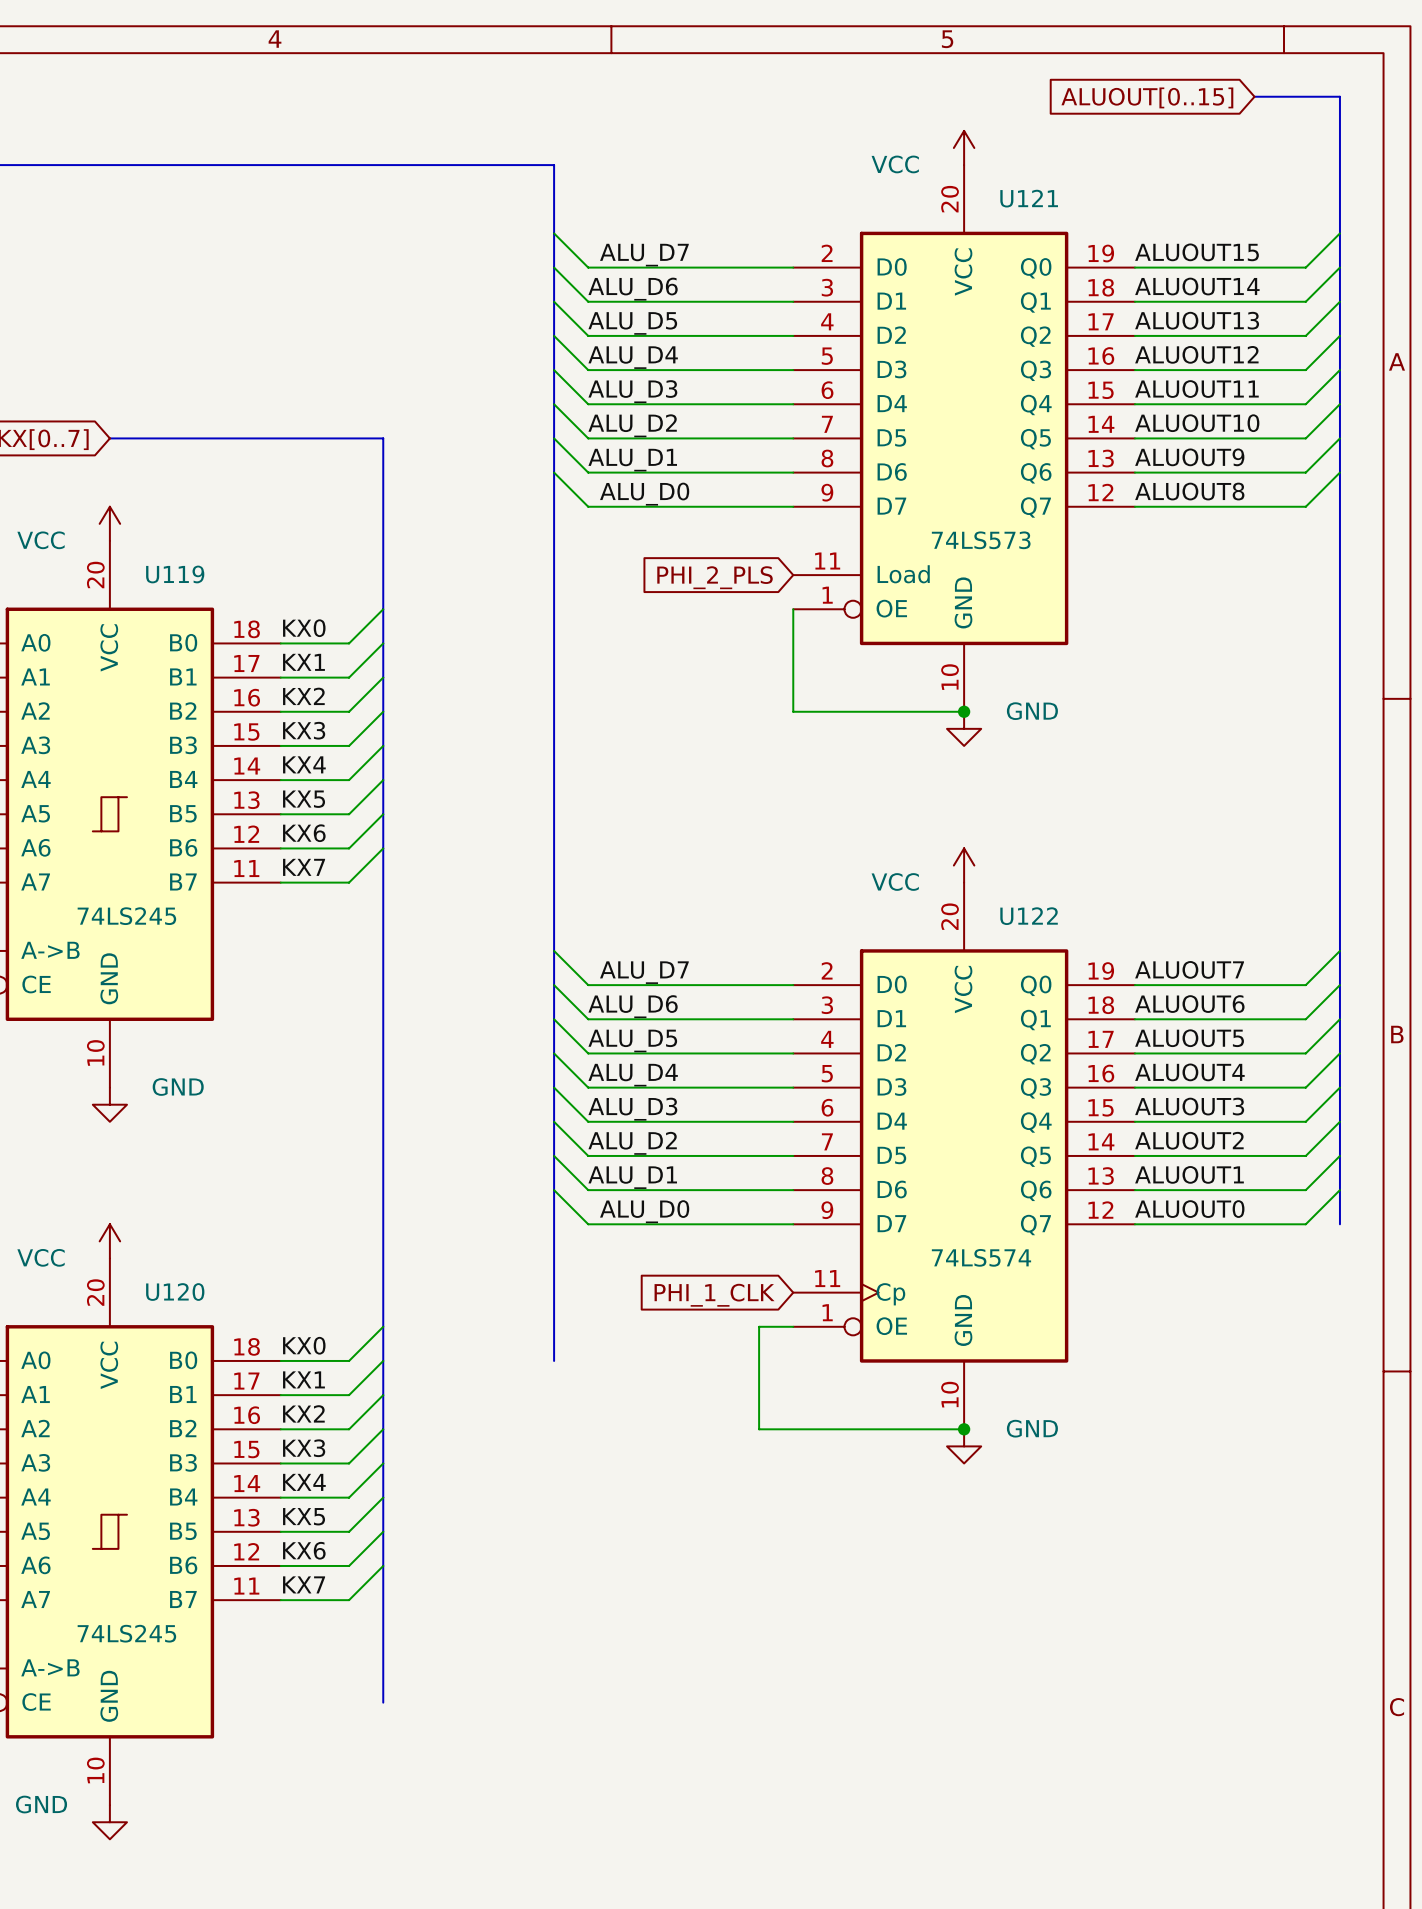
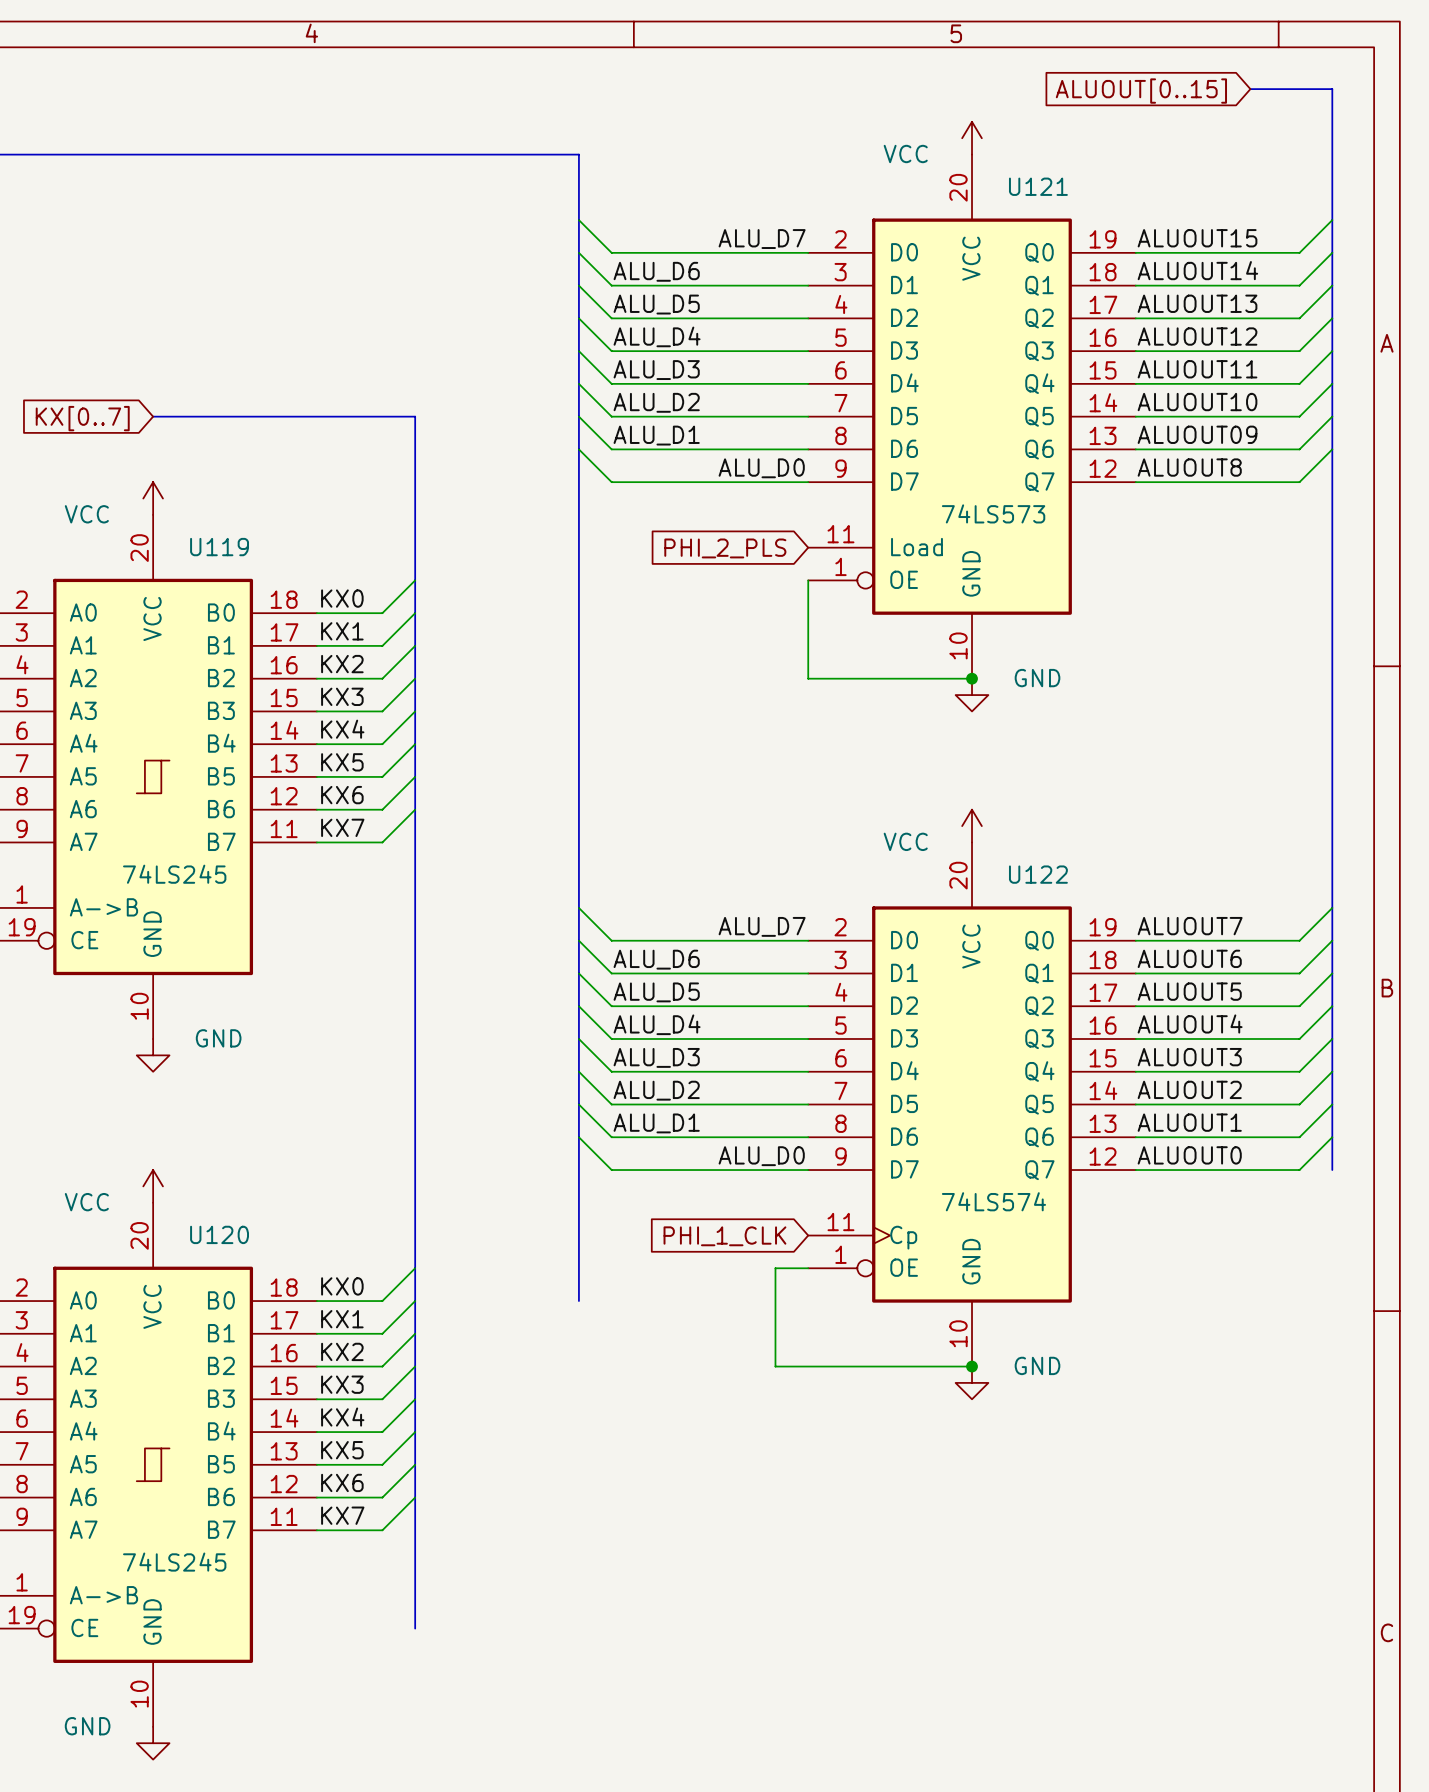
label position: ALU_D7 (644, 255) -> ALU_D7 (762, 239)
label: ALUOUT9 (1189, 457) -> ALUOUT09 (1197, 434)
label position: ALU_D0 (644, 494) -> ALU_D0 (761, 468)
label position: ALU_D7 (644, 972) -> ALU_D7 (762, 926)
label position: ALU_D0 (644, 1211) -> ALU_D0 (761, 1156)

